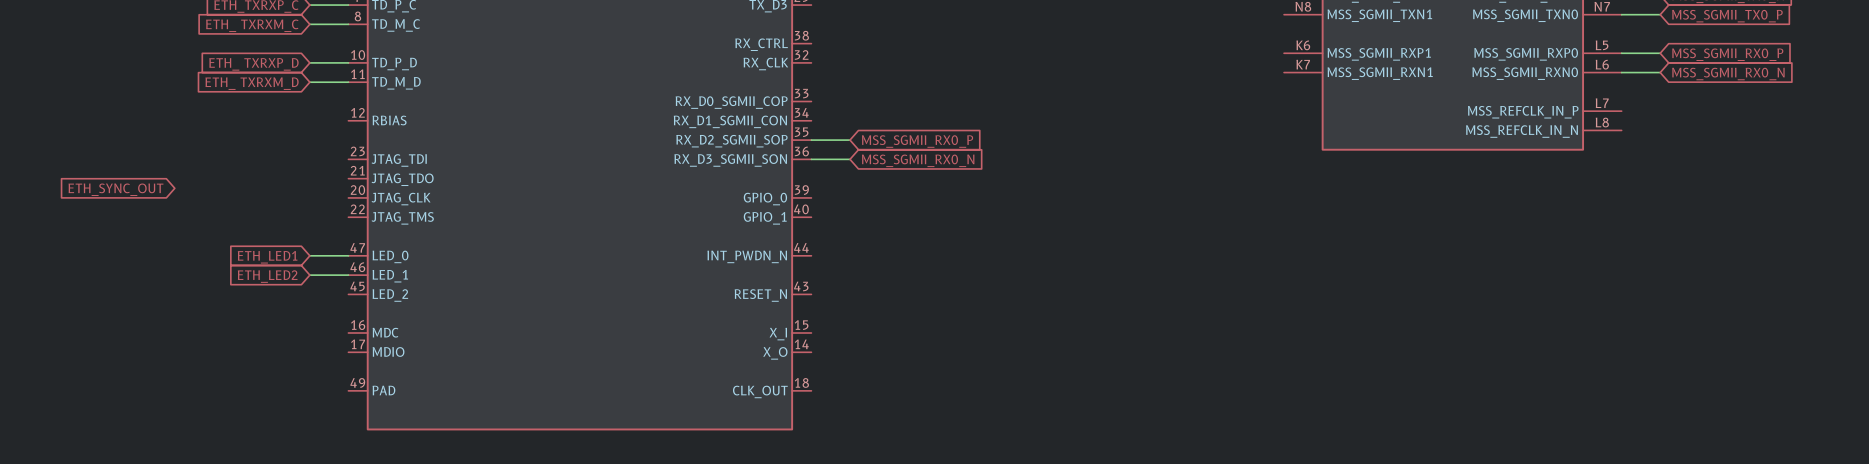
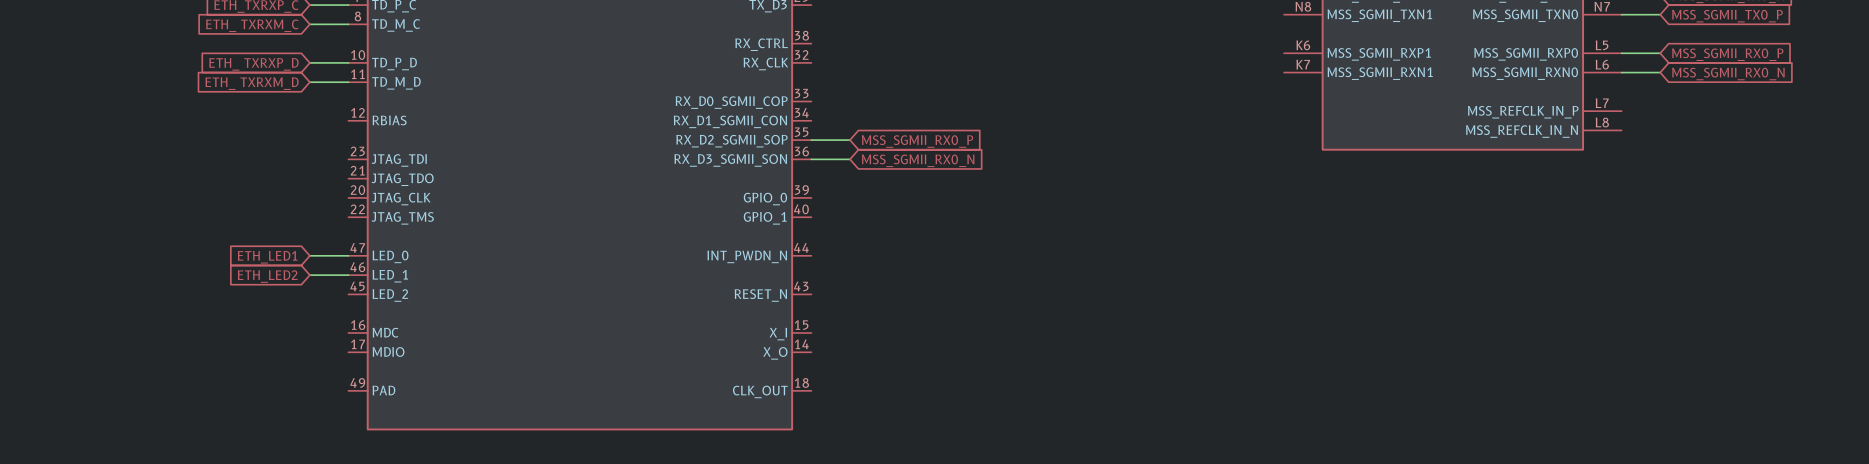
global label: ETH_SYNC_OUT (115, 189) -> none

